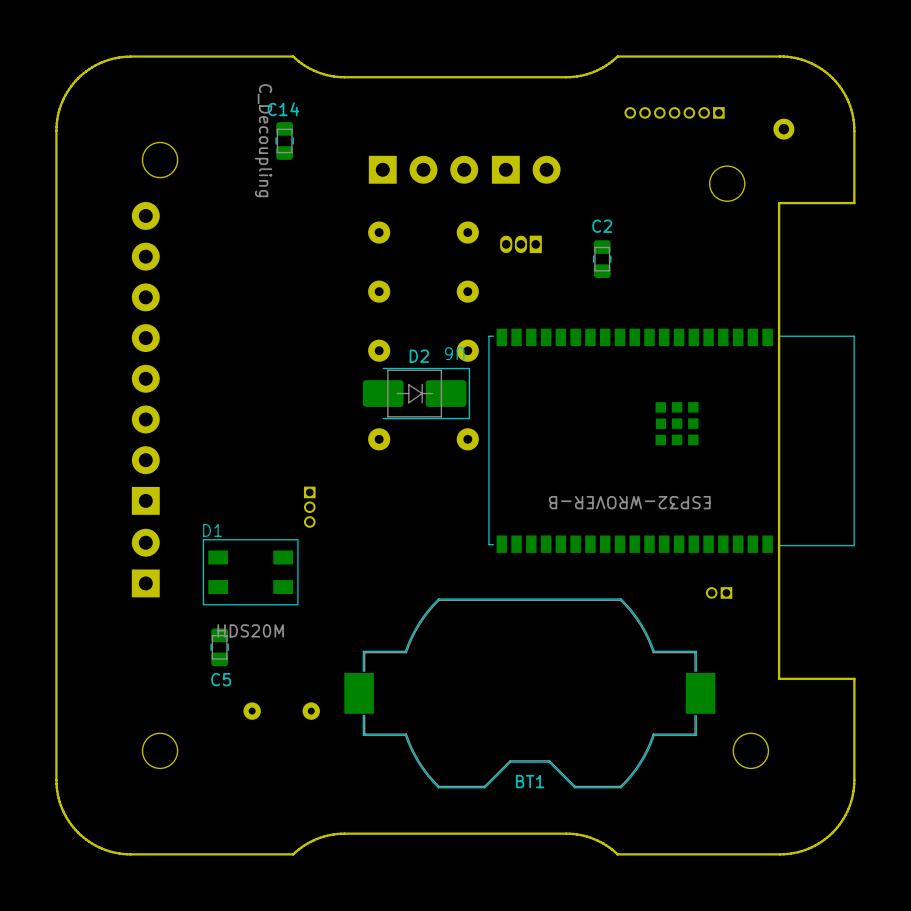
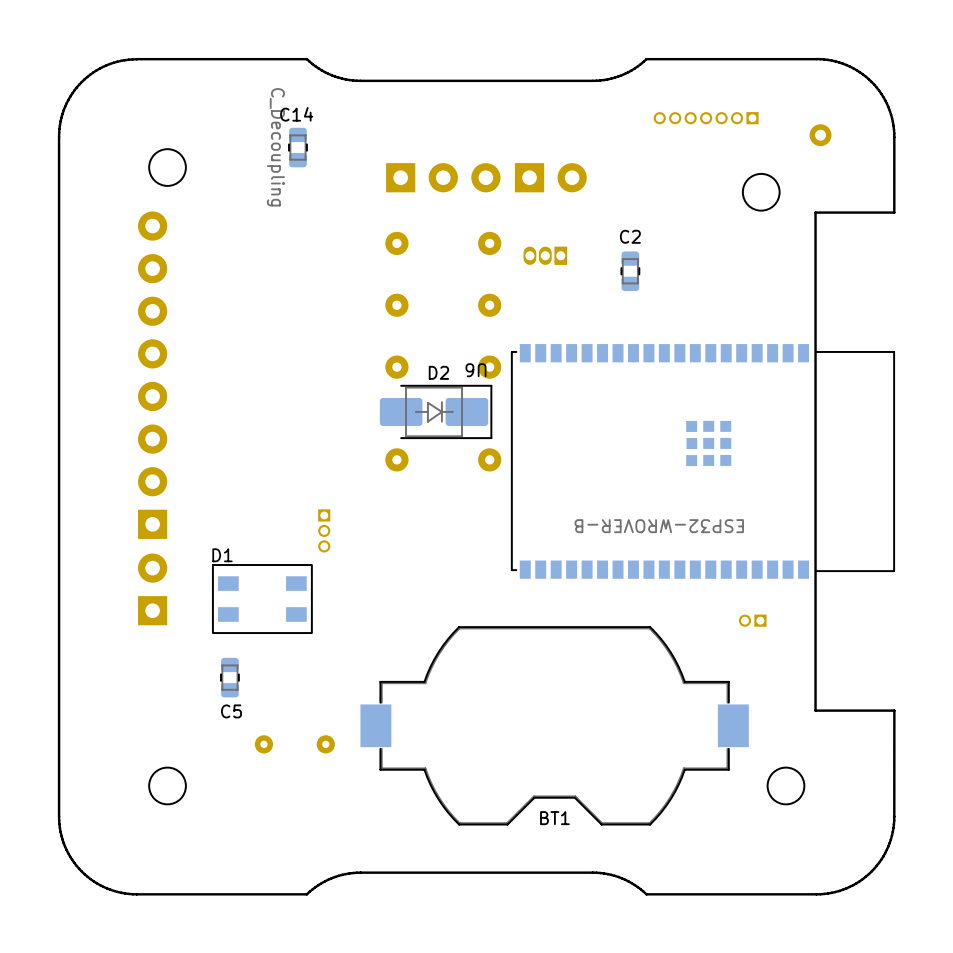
D1 value: HDS20M (250, 630) -> none

